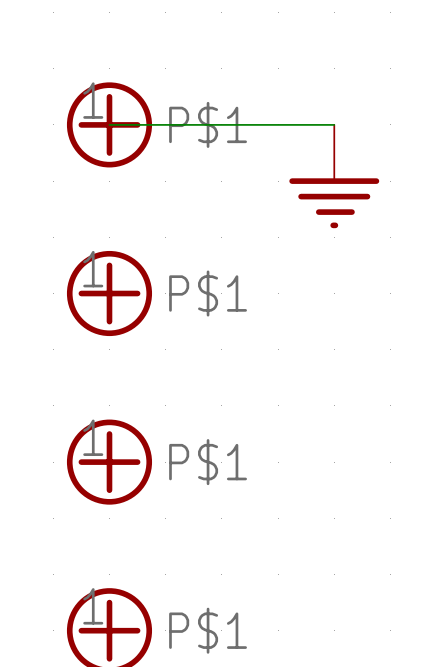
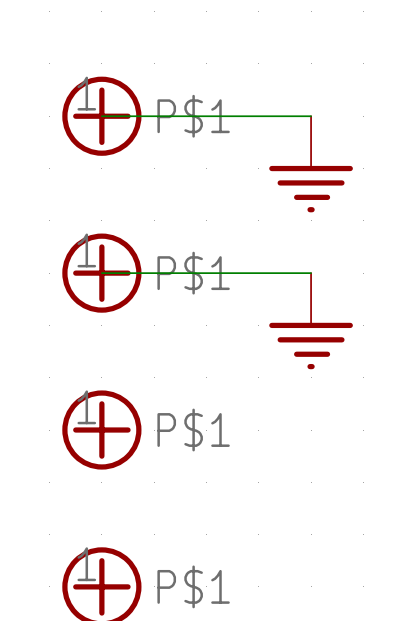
wire: none -> (101, 273) (311, 273)
power symbol: none -> (311, 321)

